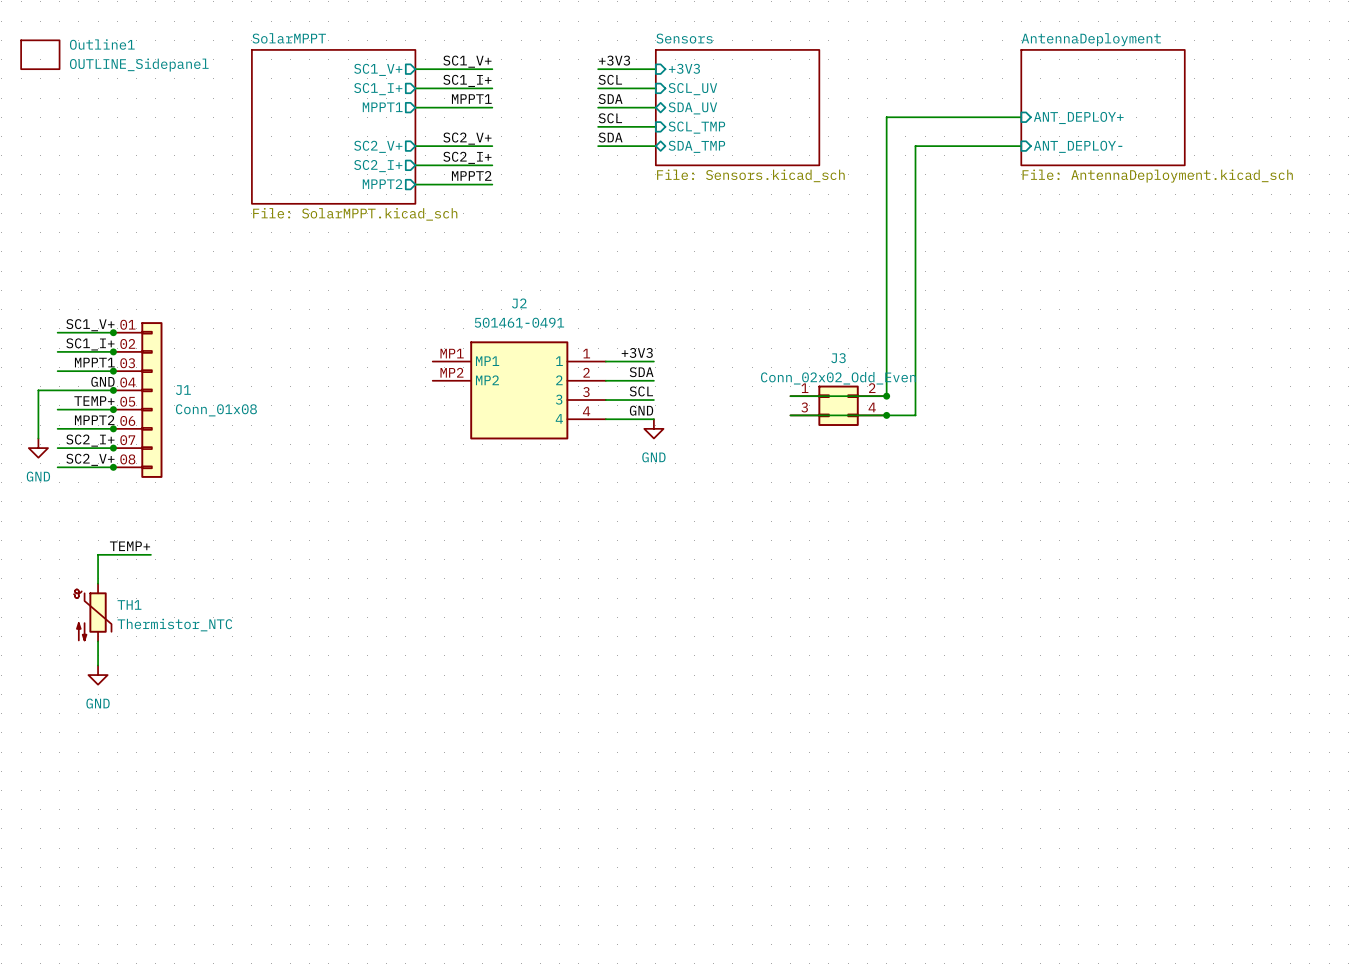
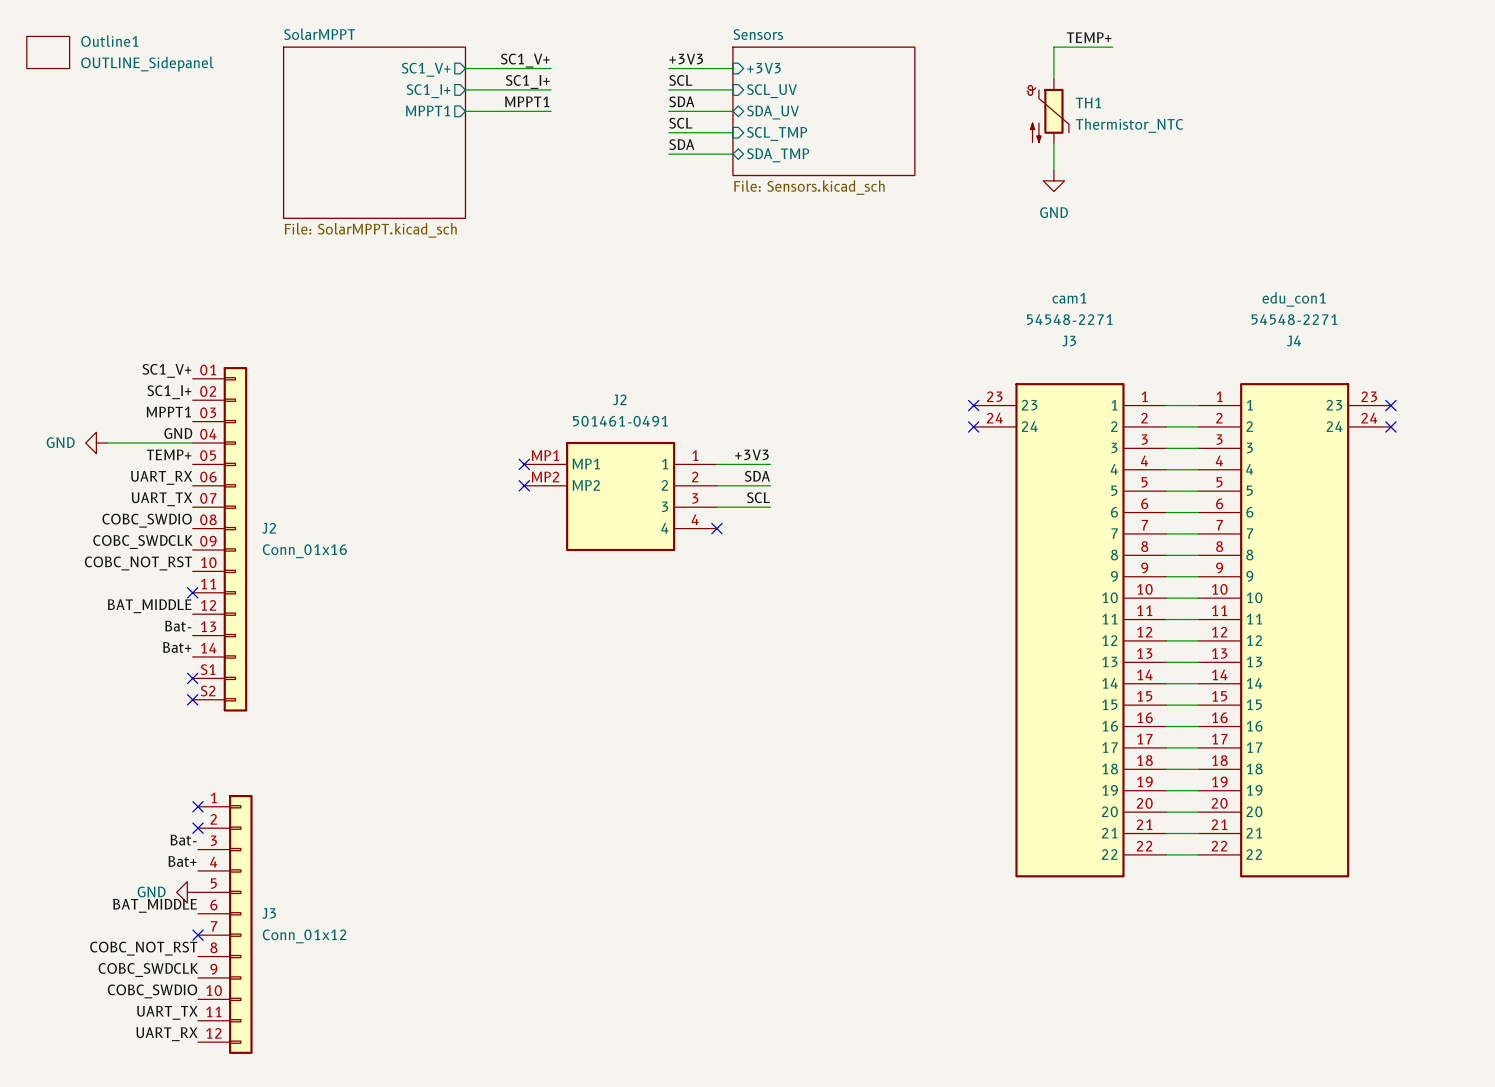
label: none -> TEMP+ (1089, 37)
wire: none -> (1112, 47) (1053, 47) (1053, 79)
sheet AntennaDeployment: File: AntennaDeployment.kicad_sch (1103, 107) -> none
wire: (1021, 117) (886, 117) (886, 396) (790, 396) -> none
sheet pin: ANT_DEPLOY+ (1078, 117) -> none
wire: none -> (1053, 143) (1053, 170)
label: SC2_V+ (467, 138) -> none
sheet pin: SC2_V+ (378, 146) -> none
wire: (415, 146) (492, 146) -> none
wire: (1021, 146) (915, 146) (915, 415) (790, 415) -> none
sheet pin: ANT_DEPLOY- (1078, 146) -> none
label: SC2_I+ (467, 157) -> none
wire: (415, 165) (492, 165) -> none
sheet pin: SC2_I+ (378, 166) -> none
power symbol: none -> GND (1053, 180)
label: MPPT2 (471, 175) -> none
sheet pin: MPPT2 (382, 184) -> none
wire: (415, 184) (492, 184) -> none
label position: SC1_V+ (90, 325) -> SC1_V+ (166, 370)
wire: (57, 332) (115, 332) -> none
junction: (113, 332) -> none
label position: SC1_I+ (90, 344) -> SC1_I+ (169, 392)
wire: (57, 351) (115, 351) -> none
junction: (113, 351) -> none
label position: +3V3 (637, 352) -> +3V3 (751, 454)
J3 name position: J3 (838, 358) -> J3 (269, 913)
wire: (605, 361) (653, 361) -> none
label position: MPPT1 (94, 362) -> MPPT1 (168, 412)
wire: (57, 371) (115, 371) -> none
junction: (113, 371) -> none
label position: SDA (641, 372) -> SDA (757, 476)
no-connect mark: none -> (973, 405)
wire: none -> (1166, 405) (1198, 405)
no-connect mark: none -> (1390, 405)
J3 value: Conn_02x02_Odd_Even (838, 378) -> Conn_01x12 (304, 936)
wire: (605, 380) (653, 380) -> (716, 464) (770, 464)
label position: GND (102, 381) -> GND (178, 433)
J3 symbol: [790, 385, 887, 426] -> [198, 795, 253, 1054]
junction: (113, 390) -> none
wire: (115, 390) (38, 390) (38, 438) -> none
part position: (519, 390) -> (620, 496)
label position: SCL (641, 391) -> SCL (758, 497)
no-connect mark: none -> (973, 426)
wire: none -> (1166, 426) (1198, 426)
no-connect mark: none -> (1390, 426)
junction: (886, 396) -> none
J1: Conn_01x08 (137, 400) -> none
wire: (605, 400) (653, 400) -> (716, 485) (770, 485)
label position: TEMP+ (94, 401) -> TEMP+ (169, 454)
wire: none -> (107, 443) (192, 443)
wire: (57, 409) (115, 409) -> none
junction: (113, 409) -> none
label: GND (641, 410) -> none
wire: none -> (1166, 448) (1198, 448)
junction: (886, 415) -> none
wire: (605, 419) (653, 419) -> (716, 507) (770, 507)
label: MPPT2 (94, 420) -> none
no-connect mark: none -> (524, 464)
wire: (57, 428) (115, 428) -> none
junction: (113, 428) -> none
power symbol: GND (653, 428) -> none
wire: none -> (1166, 469) (1198, 469)
label: none -> UART_RX (161, 477)
label: SC2_I+ (90, 440) -> none
no-connect mark: none -> (524, 485)
power symbol rotation: 0° (38, 448) -> 90° clockwise (96, 443)
power symbol position: GND (38, 448) -> GND (96, 443)
wire: (57, 448) (115, 448) -> none
junction: (113, 448) -> none
wire: none -> (1166, 491) (1198, 491)
label: none -> UART_TX (161, 499)
label: SC2_V+ (90, 459) -> none
wire: (57, 467) (115, 467) -> none
junction: (113, 467) -> none
wire: none -> (1166, 512) (1198, 512)
label: none -> COBC_SWDIO (147, 520)
no-connect mark: none -> (716, 528)
wire: none -> (1166, 533) (1198, 533)
J2: none -> Conn_01x16 (219, 539)
label: none -> COBC_SWDCLK (142, 542)
wire: none -> (1166, 555) (1198, 555)
label: none -> COBC_NOT_RST (138, 563)
wire: none -> (1166, 576) (1198, 576)
no-connect mark: none -> (192, 592)
wire: none -> (1166, 598) (1198, 598)
label: TEMP+ (130, 546) -> none
label: none -> BAT_MIDDLE (149, 606)
wire: (150, 554) (98, 554) (98, 583) -> none
wire: none -> (1166, 619) (1198, 619)
label: none -> Bat- (178, 626)
cam1: none -> 54548-2271 (1069, 630)
edu_con1: none -> 54548-2271 (1294, 630)
wire: none -> (1166, 640) (1198, 640)
label: none -> Bat+ (177, 647)
wire: none -> (1166, 662) (1198, 662)
TH1 position: (92, 612) -> (1048, 111)
no-connect mark: none -> (192, 678)
wire: none -> (1166, 683) (1198, 683)
no-connect mark: none -> (192, 699)
wire: (98, 641) (98, 665) -> none
wire: none -> (1166, 705) (1198, 705)
wire: none -> (1166, 726) (1198, 726)
power symbol: GND (98, 675) -> none
wire: none -> (1166, 747) (1198, 747)
wire: none -> (1166, 769) (1198, 769)
wire: none -> (1166, 790) (1198, 790)
no-connect mark: none -> (198, 806)
wire: none -> (1166, 812) (1198, 812)
no-connect mark: none -> (198, 828)
wire: none -> (1166, 833) (1198, 833)
label: none -> Bat- (183, 840)
wire: none -> (1166, 854) (1198, 854)
label: none -> Bat+ (182, 861)
power symbol: none -> GND (187, 892)
label: none -> BAT_MIDDLE (155, 905)
no-connect mark: none -> (198, 935)
label: none -> COBC_NOT_RST (143, 948)
label: none -> COBC_SWDCLK (148, 970)
label: none -> COBC_SWDIO (152, 991)
label: none -> UART_TX (167, 1012)
label: none -> UART_RX (166, 1034)

